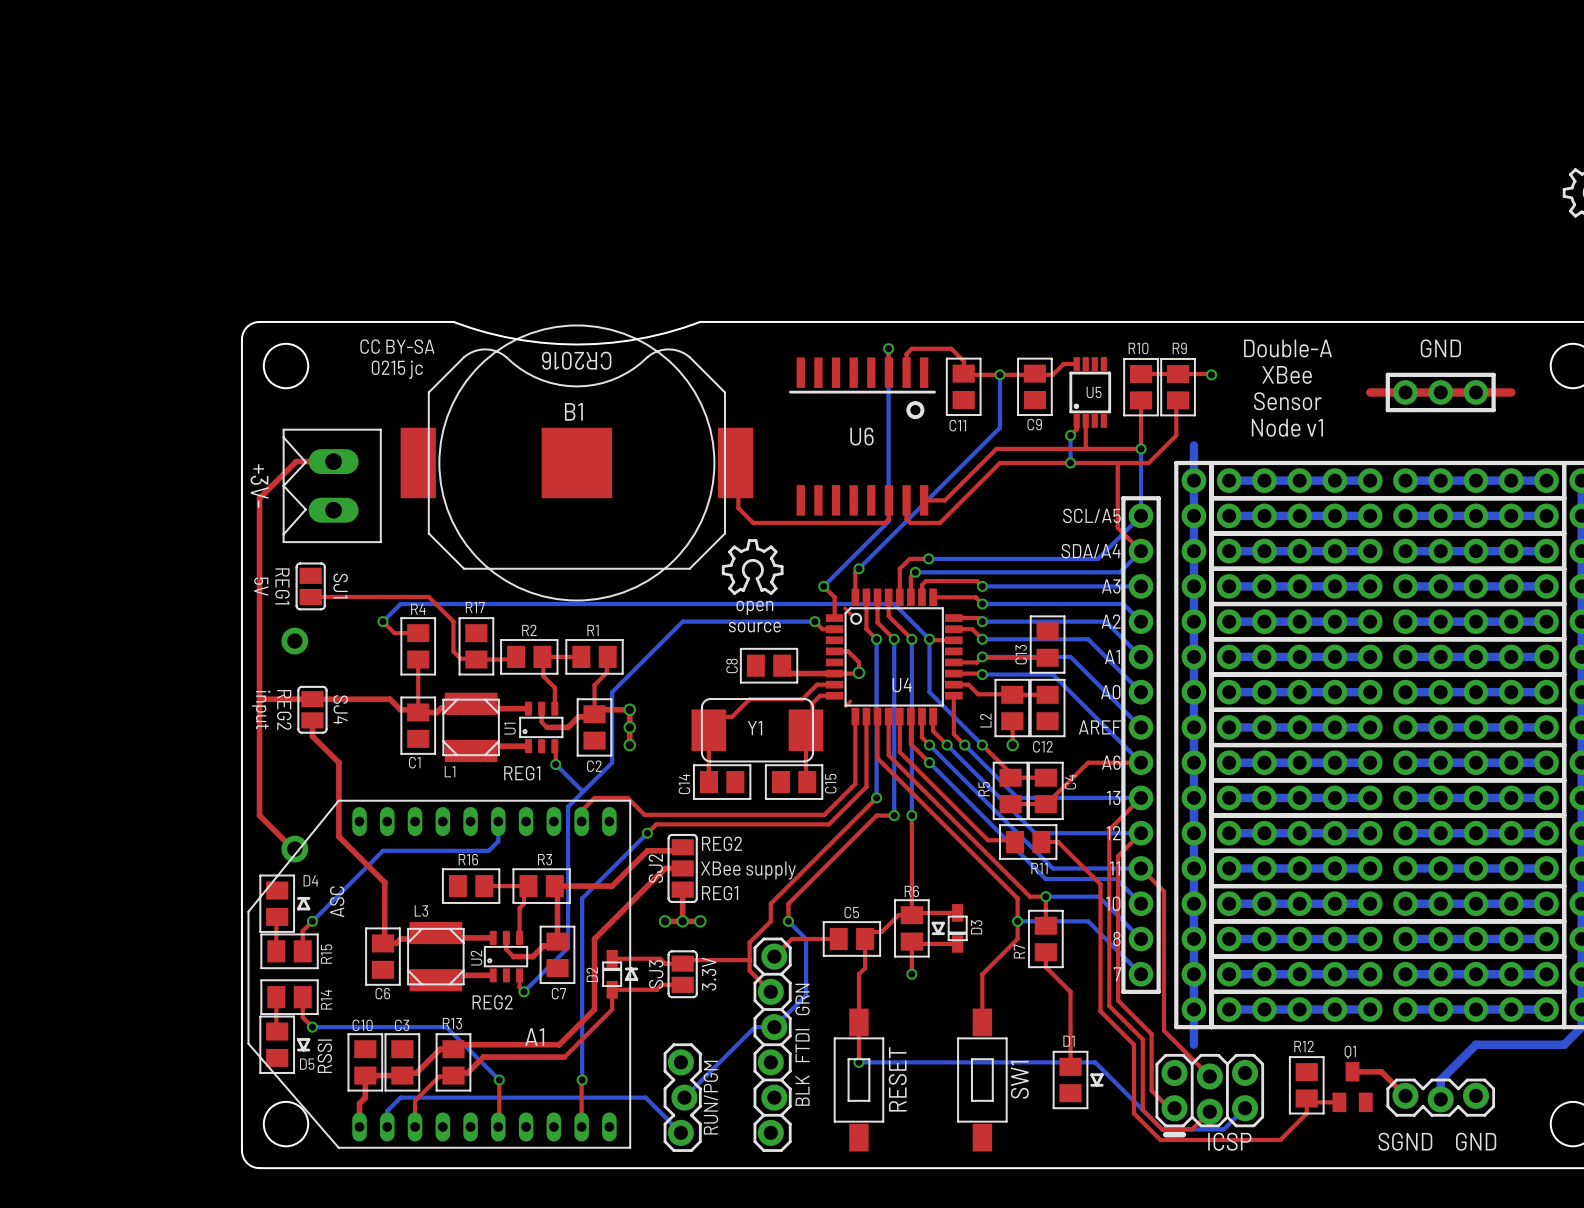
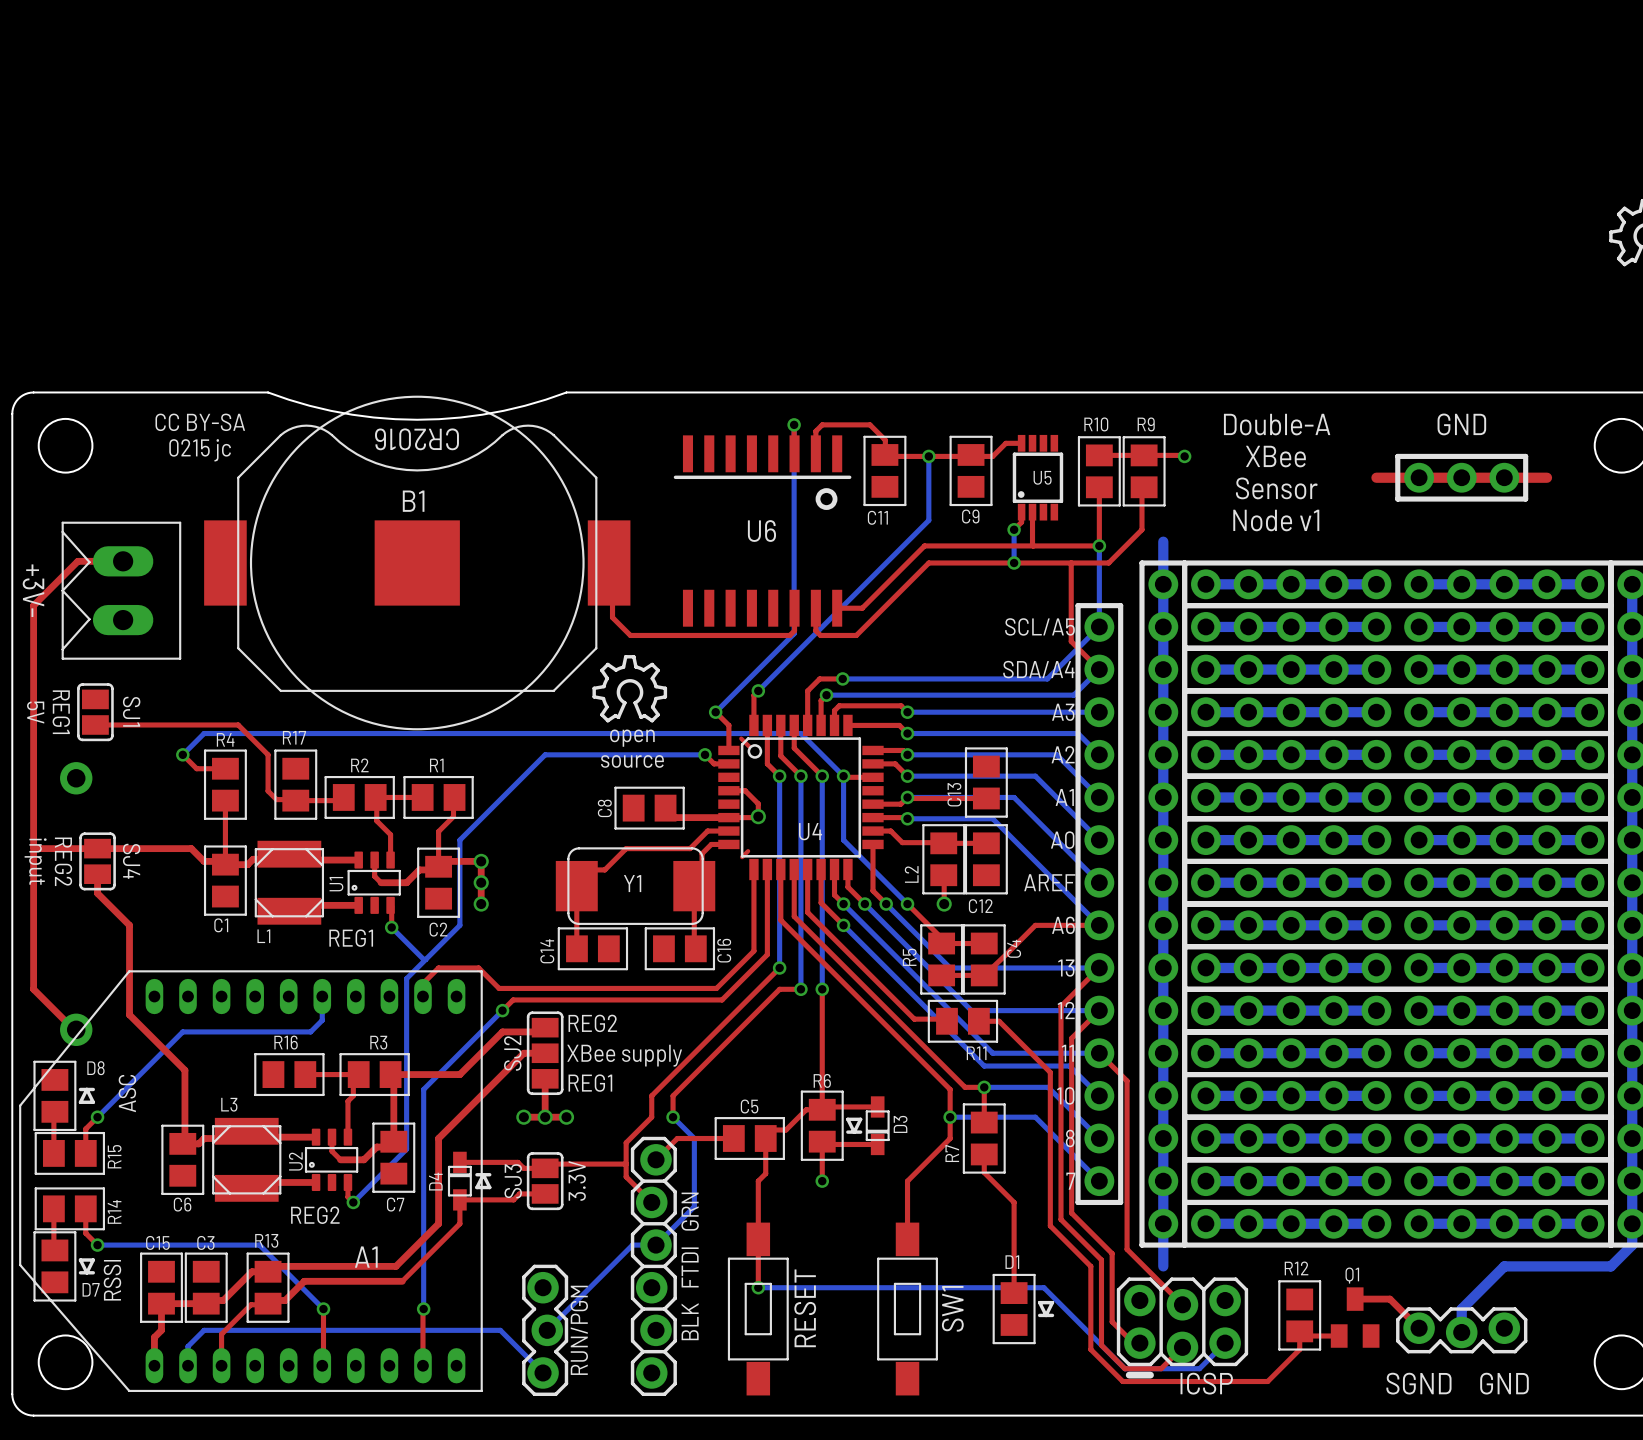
C15 name: C15 (830, 783) -> C16 (724, 950)
D4 name: D4 (310, 880) -> D8 (95, 1068)
D2 name: D2 (592, 974) -> D4 (435, 1181)
C10 name: C10 (362, 1025) -> C15 (157, 1242)
D5 name: D5 (307, 1064) -> D7 (91, 1289)

